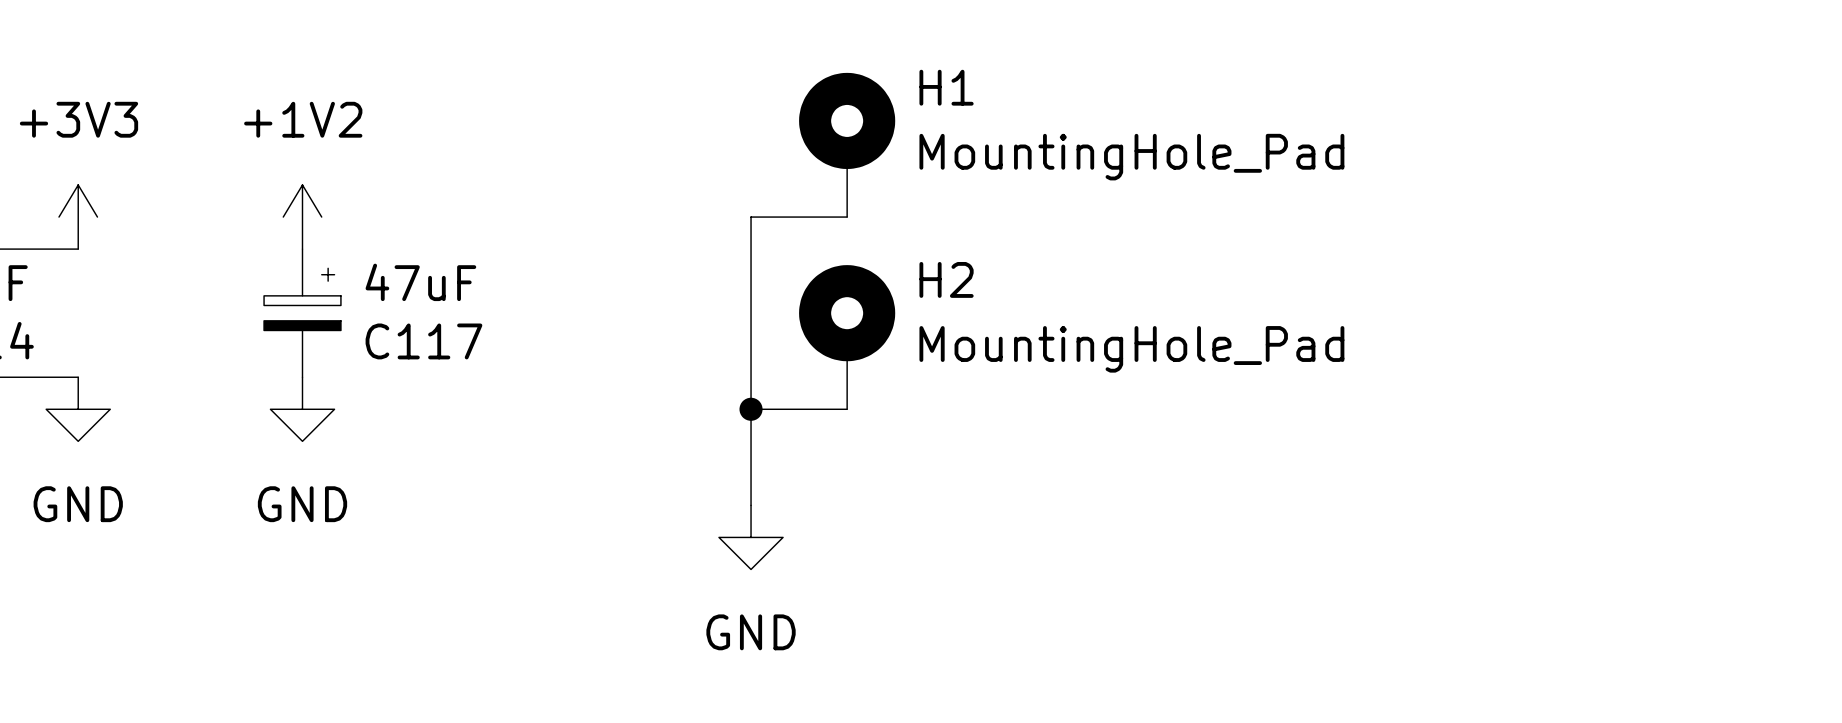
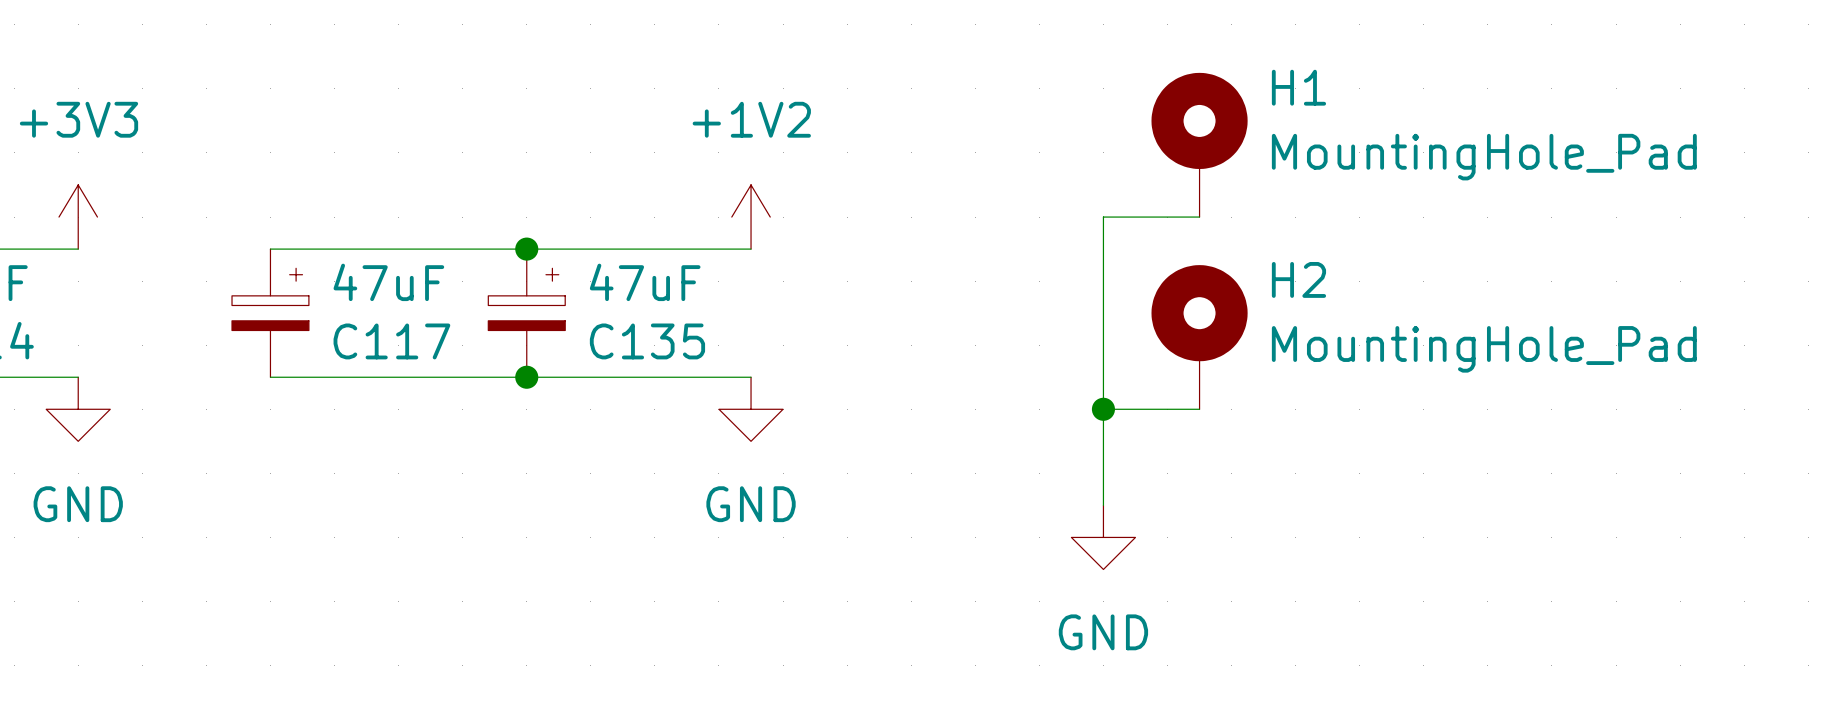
H1 position: (847, 144) -> (1199, 144)
power symbol position: +1V2 (302, 217) -> +1V2 (751, 217)
wire: (847, 217) (751, 217) (751, 505) -> (1199, 217) (1103, 217) (1103, 505)
wire: none -> (270, 249) (751, 249)
junction: none -> (526, 249)
C117 position: (302, 313) -> (270, 313)
C135: none -> 47uF (526, 313)
H2 position: (847, 337) -> (1199, 337)
wire: none -> (270, 377) (751, 377)
junction: none -> (526, 377)
power symbol: GND (302, 409) -> none
wire: (751, 409) (847, 409) -> (1103, 409) (1199, 409)
junction: (751, 409) -> none
junction: none -> (1103, 409)
power symbol position: GND (751, 537) -> GND (751, 409)
power symbol: none -> GND (1103, 537)

